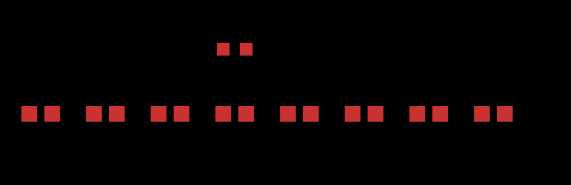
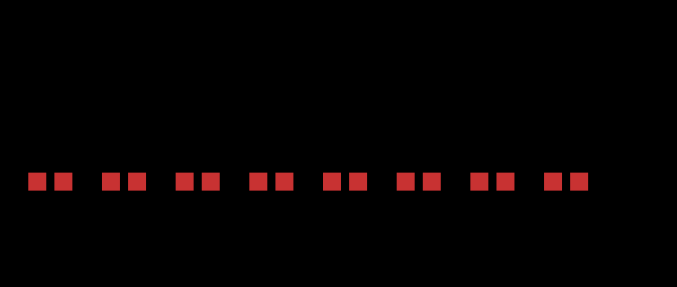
part: (234, 49) -> none

